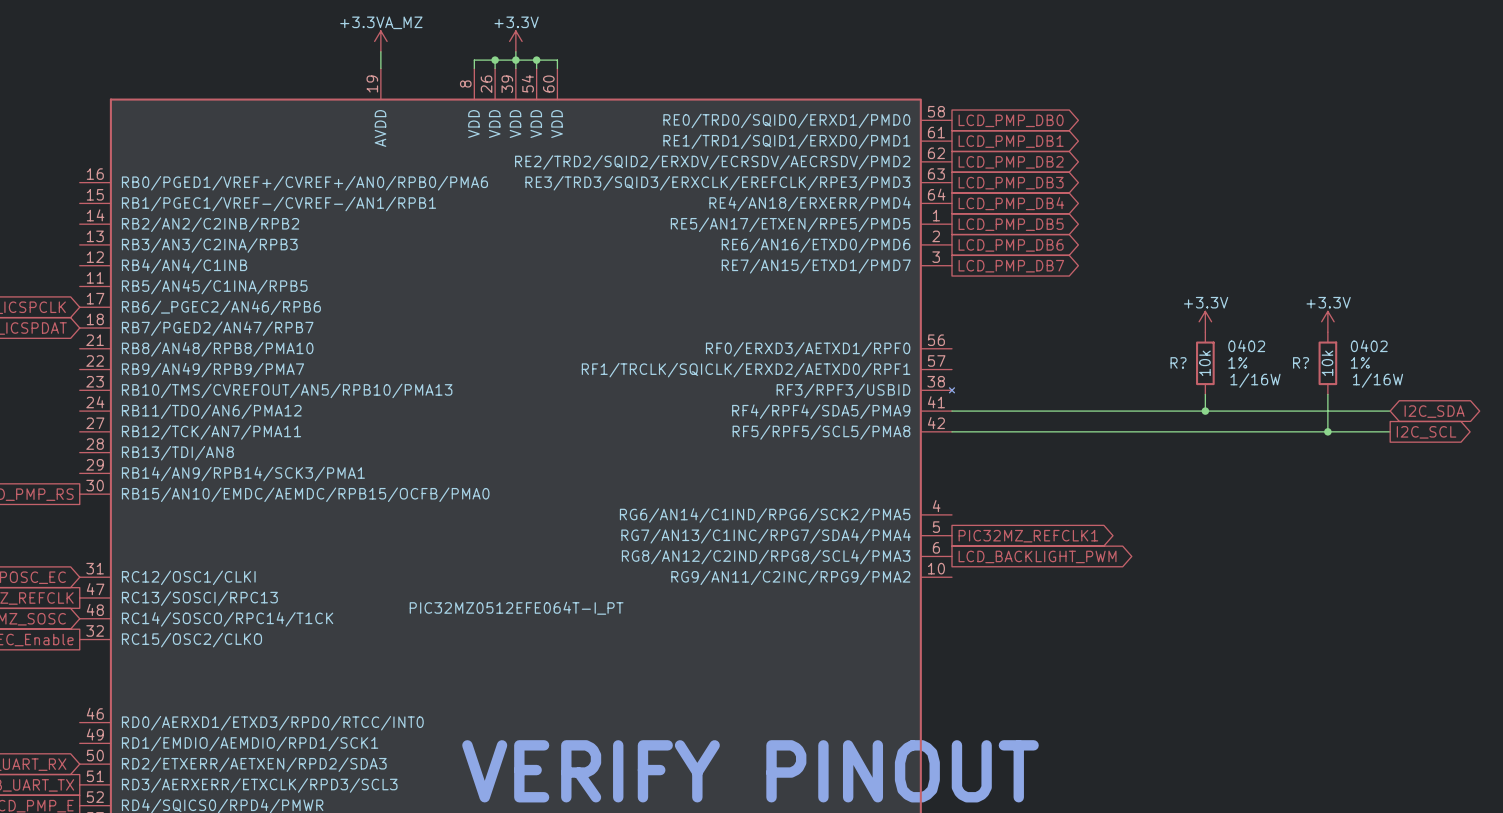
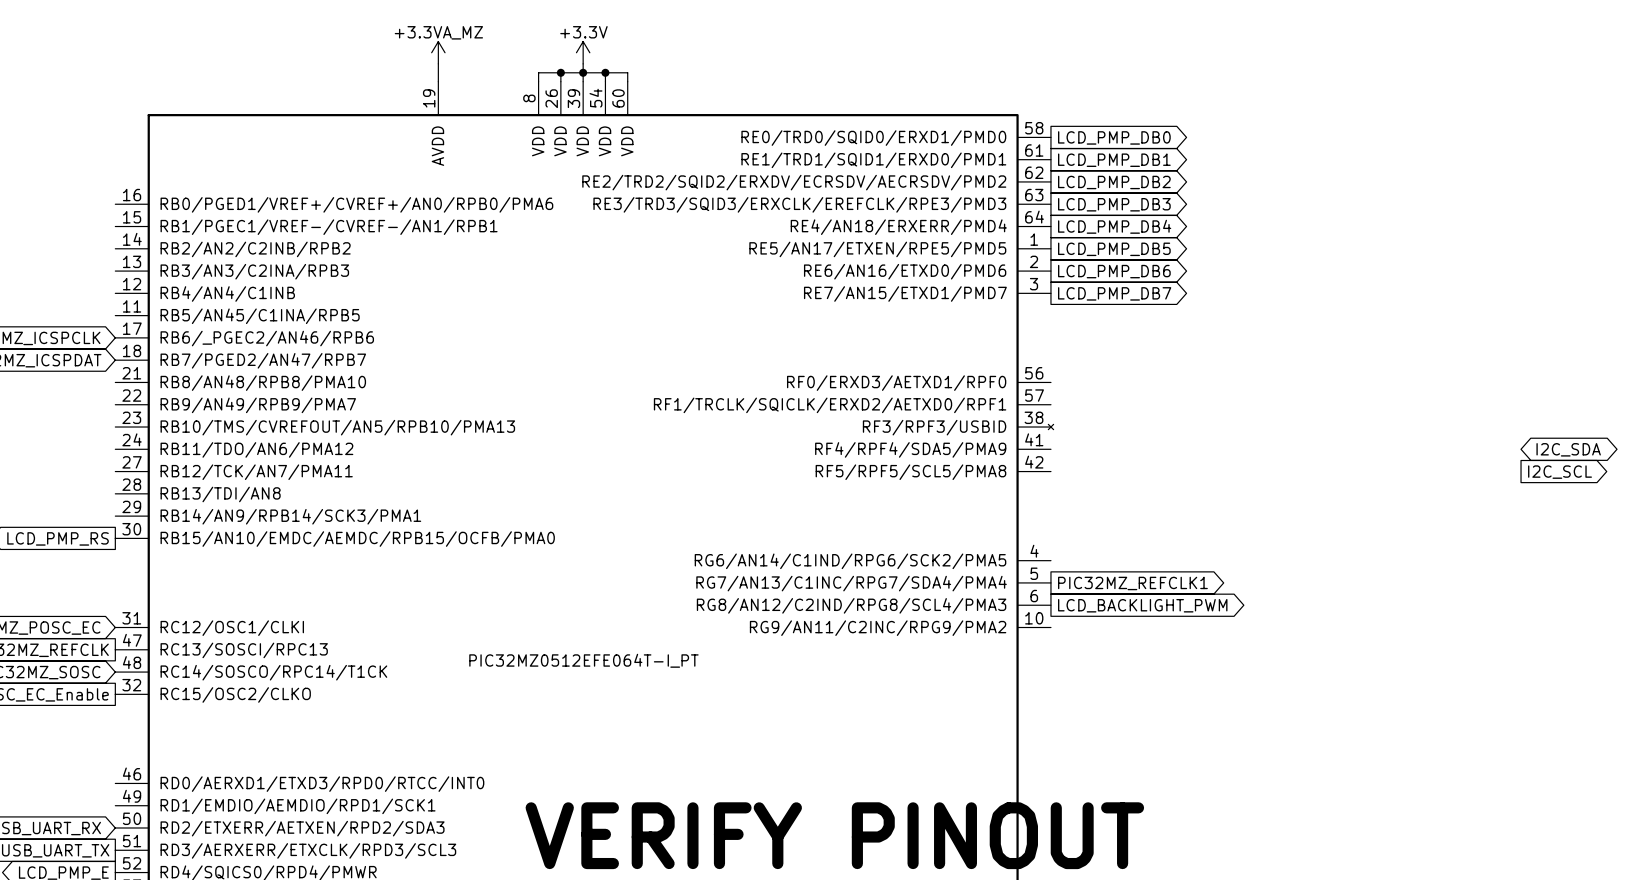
power symbol: +3.3V (1205, 321) -> none
power symbol: +3.3V (1327, 321) -> none
R?: 10k (1205, 363) -> none
R?: 10k (1327, 363) -> none
wire: (1205, 394) (1205, 411) -> none
wire: (1327, 394) (1327, 431) -> none
wire: (951, 411) (1390, 411) -> none
junction: (1205, 411) -> none
wire: (951, 431) (1390, 431) -> none
junction: (1327, 431) -> none

